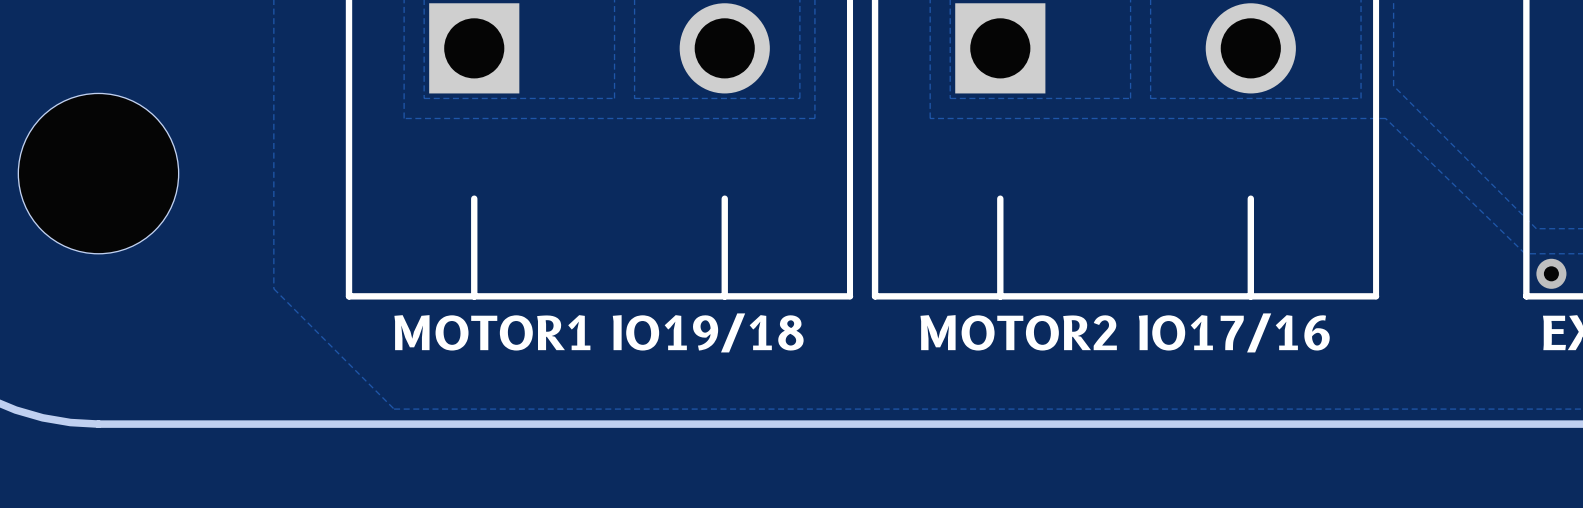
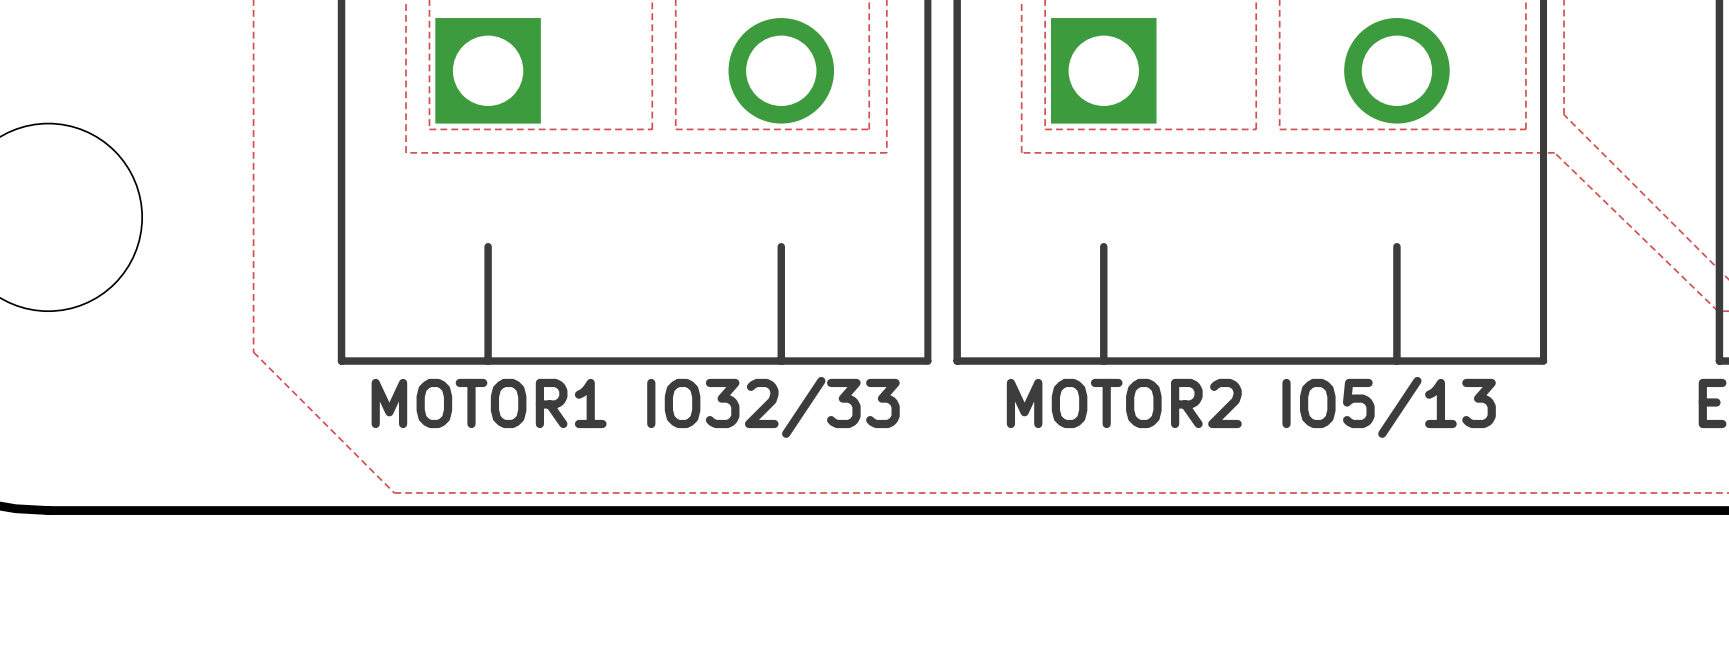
text: MOTOR1 IO19/18 (599, 332) -> MOTOR1 IO32/33 (635, 407)
text: MOTOR2 IO17/16 (1125, 332) -> MOTOR2 IO5/13 (1251, 407)

